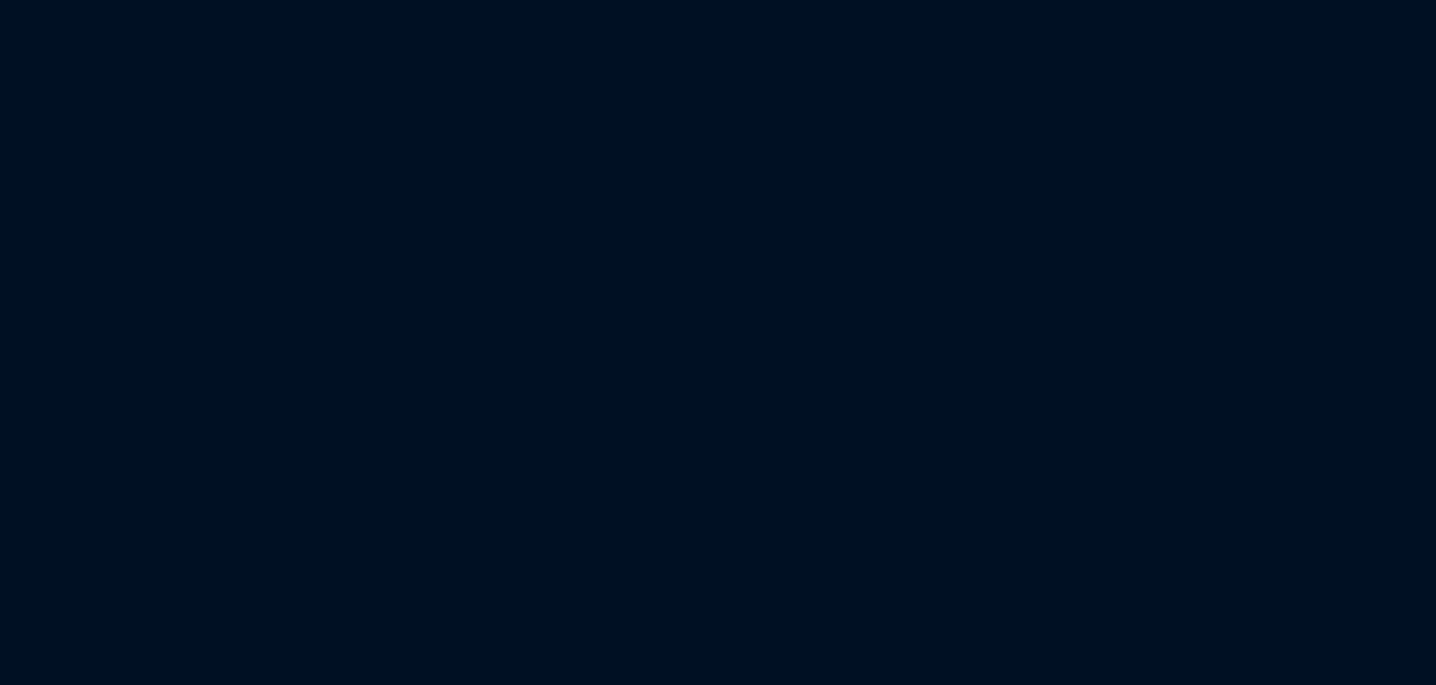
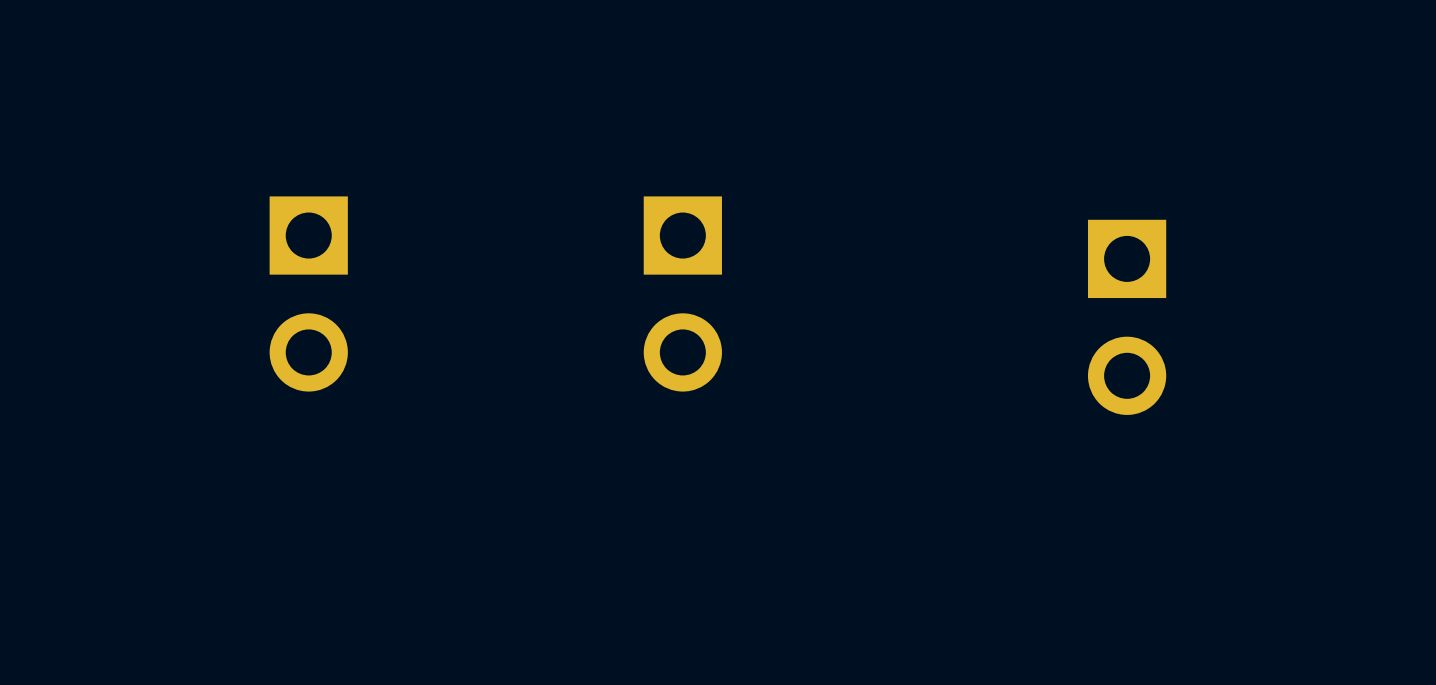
part: none -> (308, 293)
part: none -> (682, 293)
part: none -> (1127, 317)

